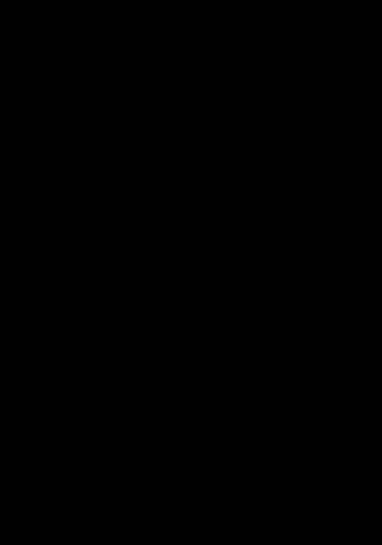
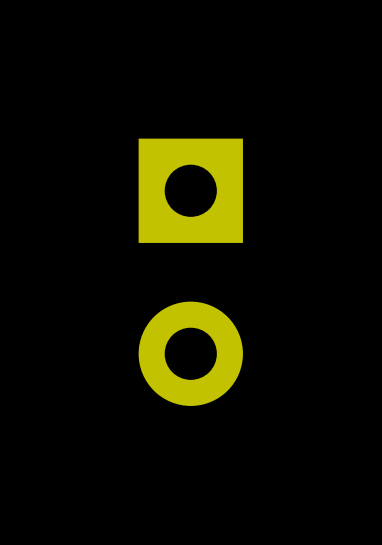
part: none -> (190, 272)

